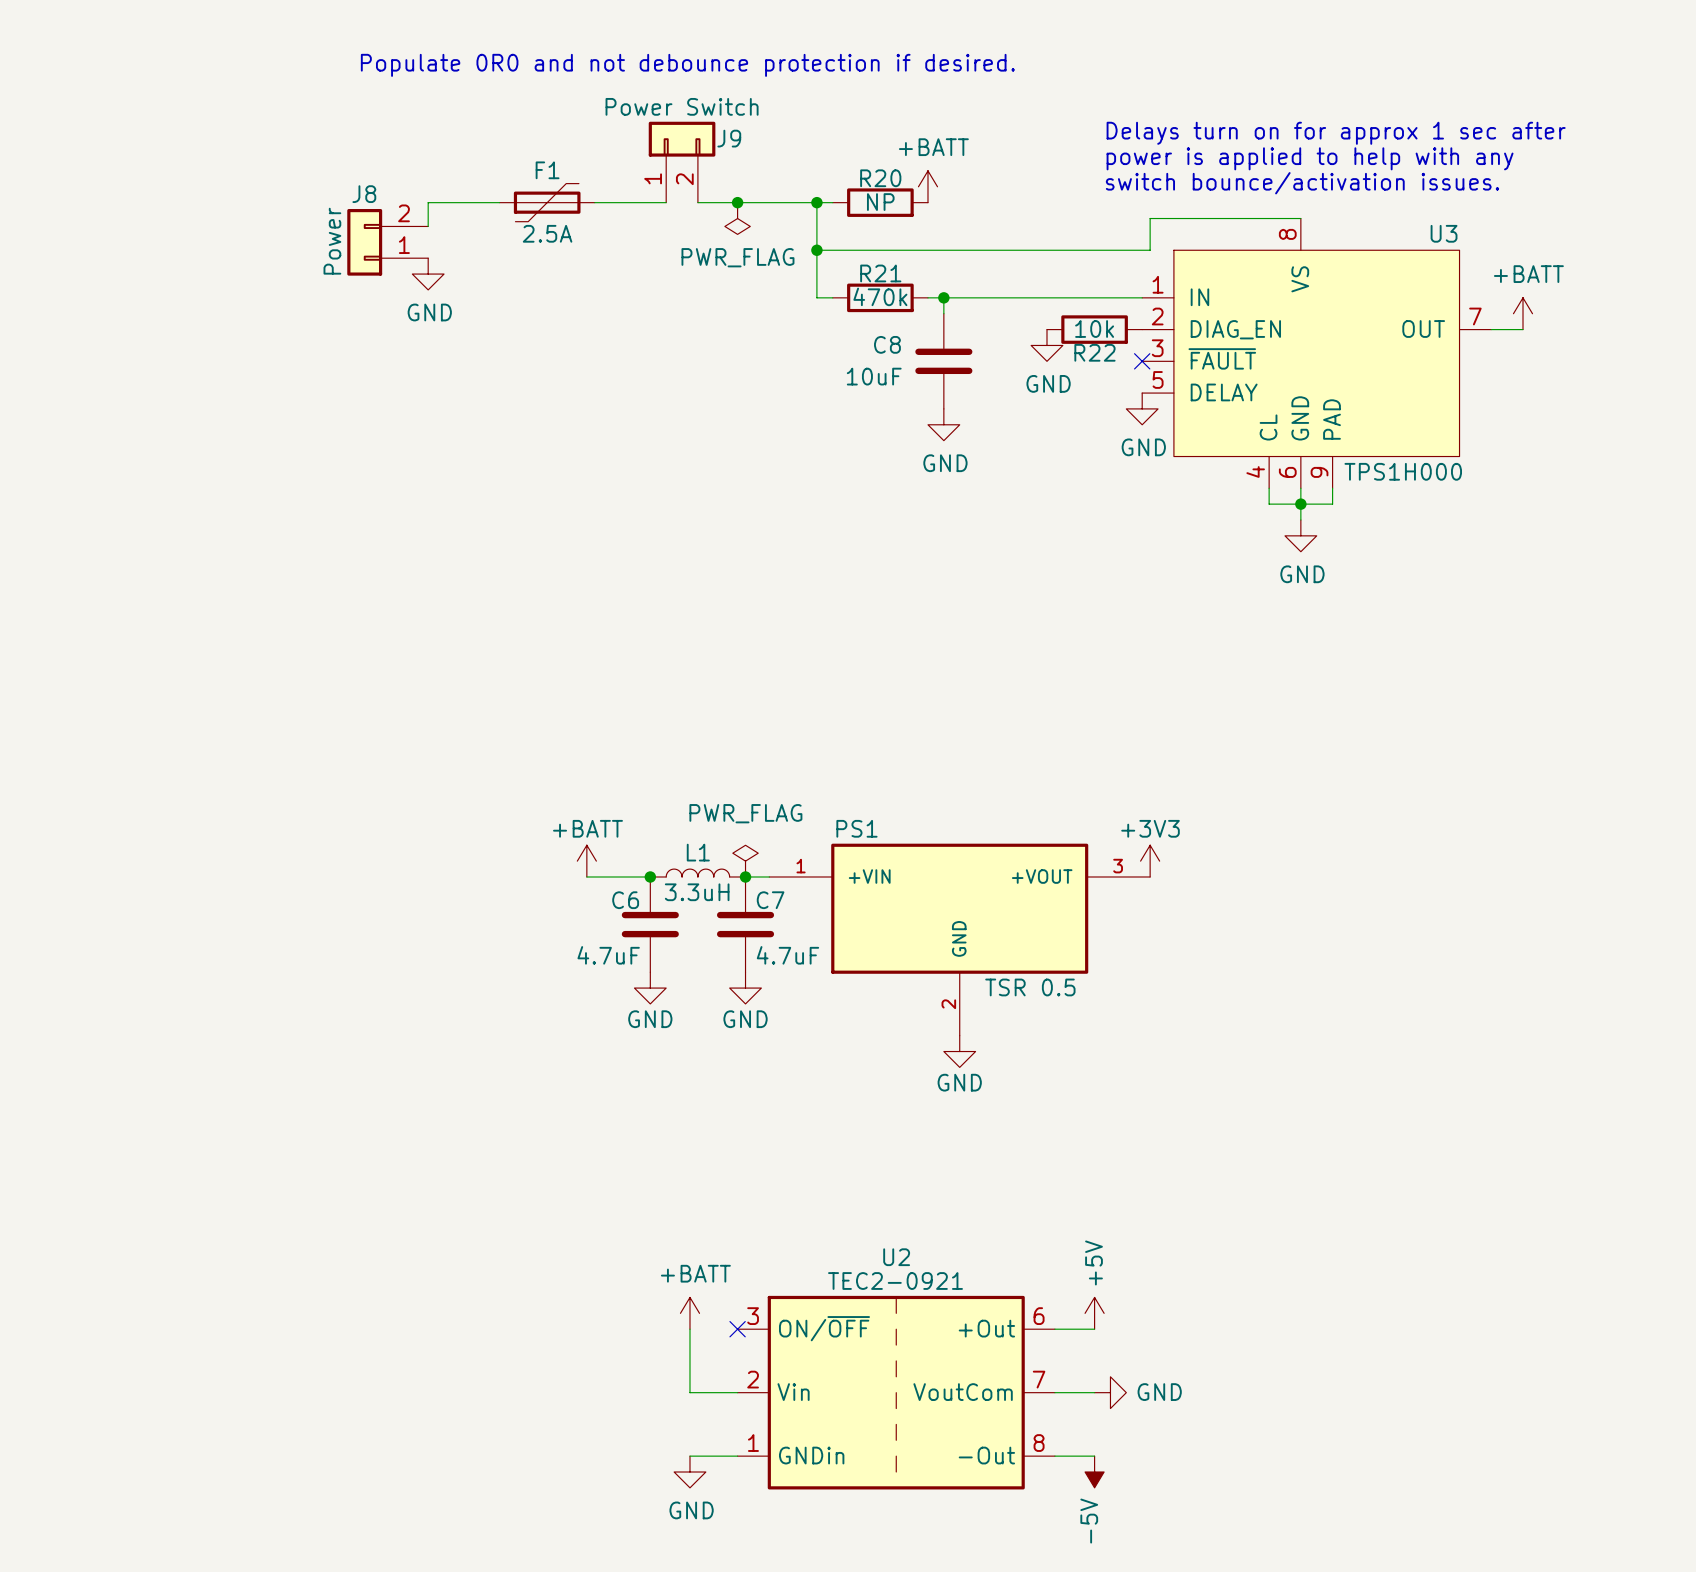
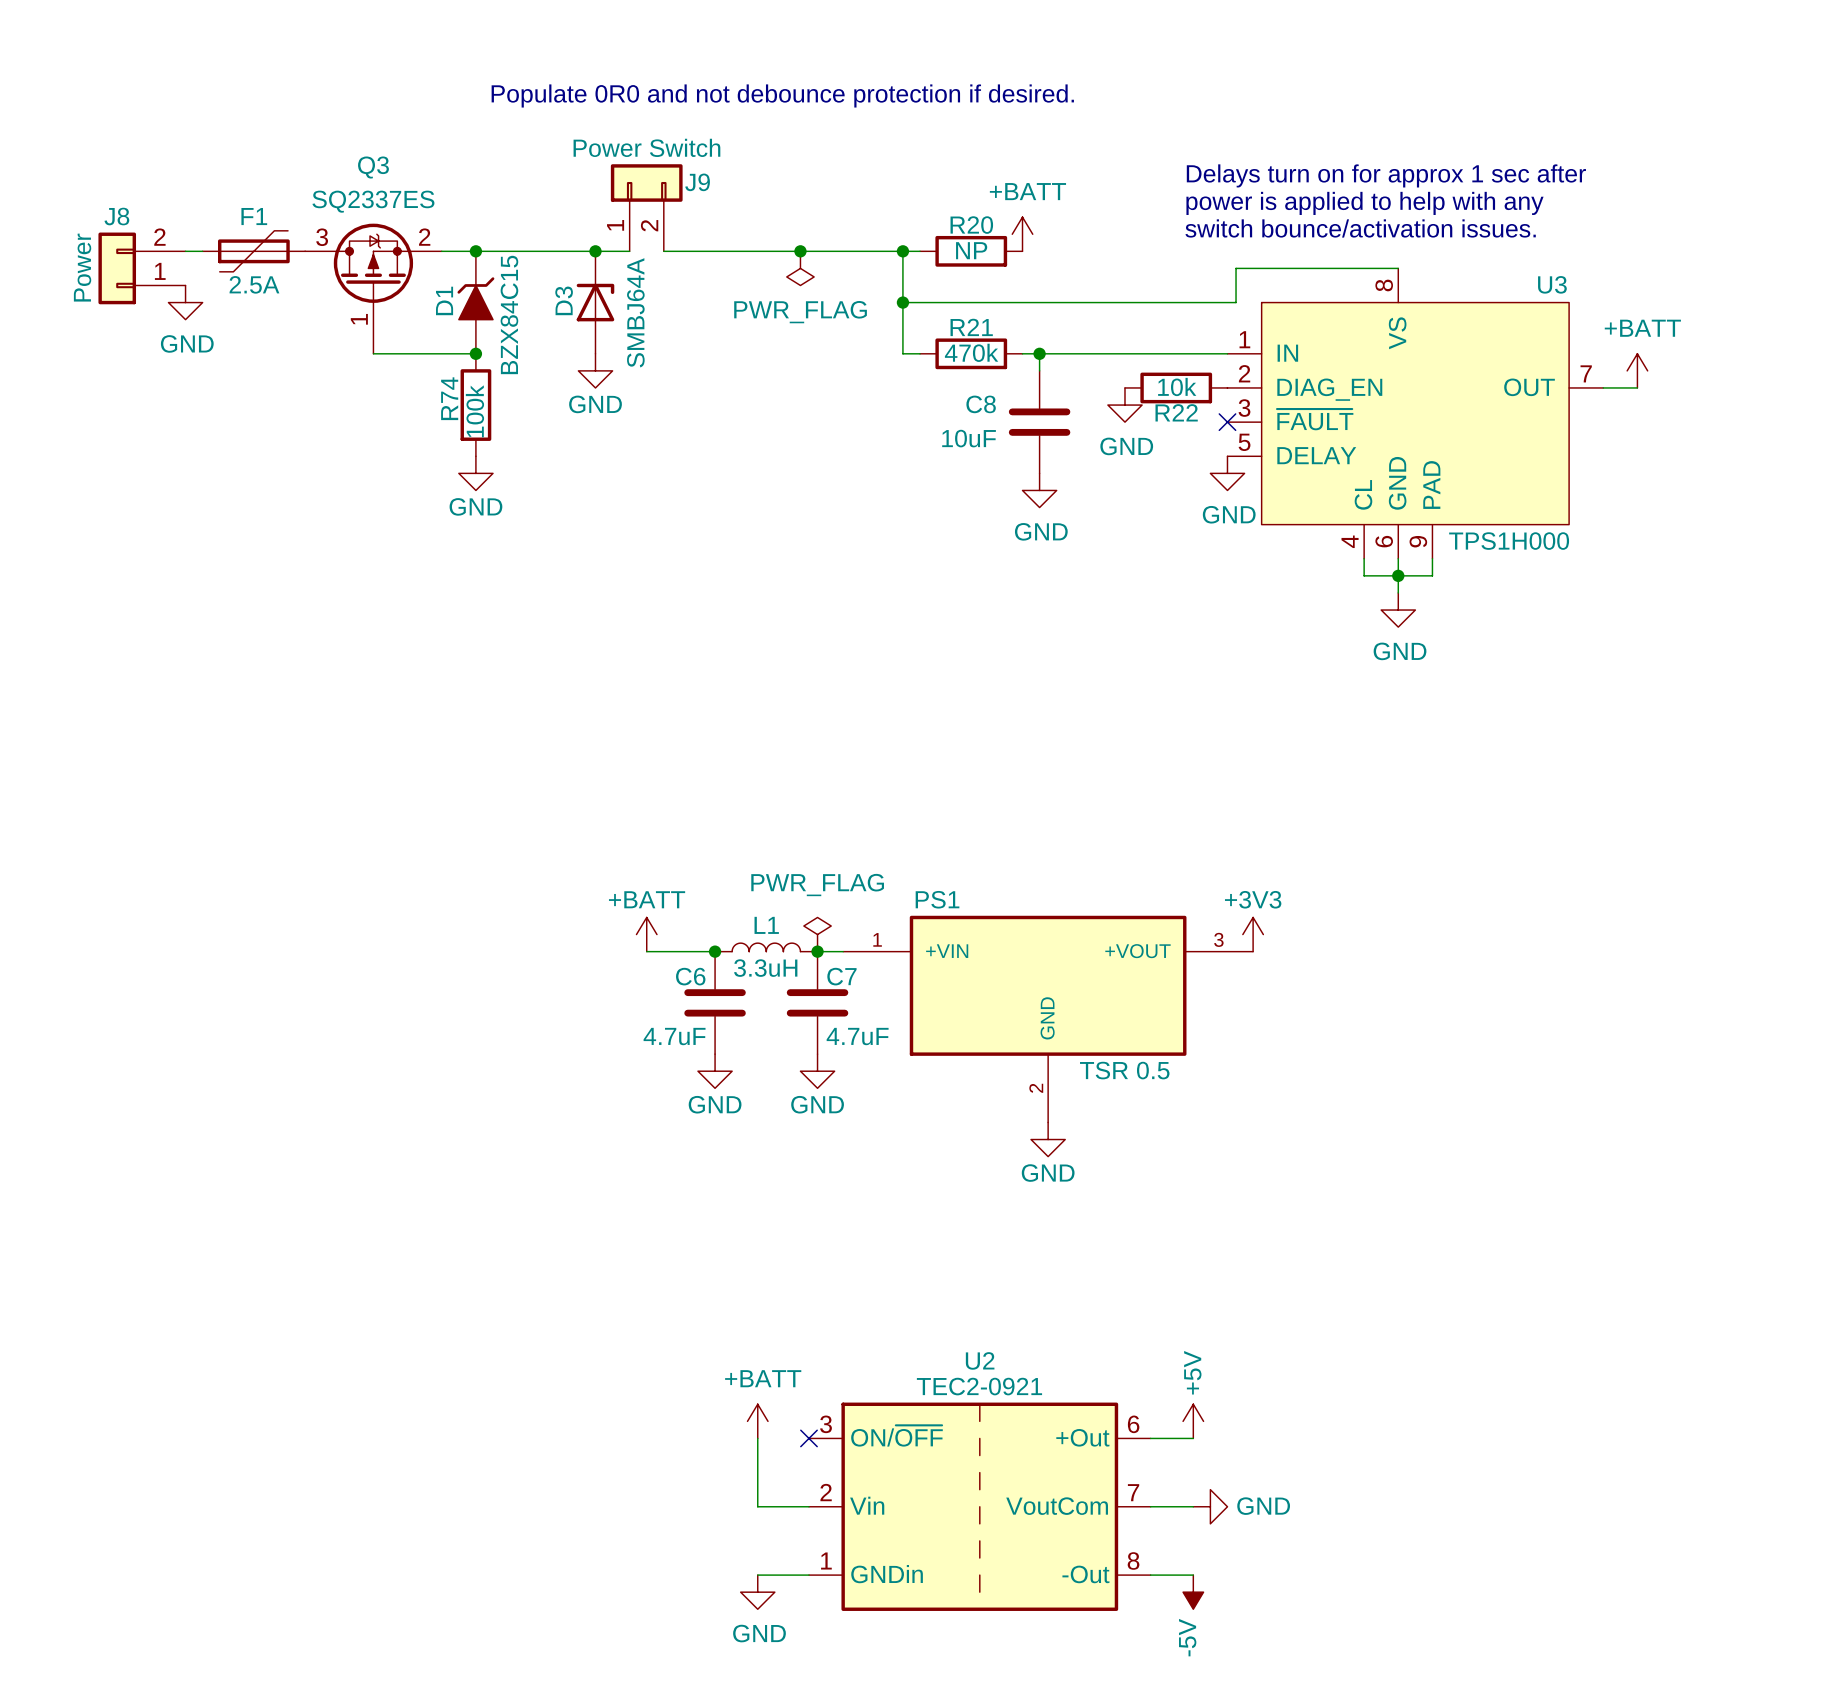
text position: Populate 0R0 and not debounce protection if desired. (687, 65) -> Populate 0R0 and not debounce protection if desired. (782, 95)
text position: Delays turn on for approx 1 sec after (1336, 133) -> Delays turn on for approx 1 sec after (1386, 175)
text position: power is applied to help with any (1310, 158) -> power is applied to help with any (1364, 203)
J9 position: (682, 162) -> (646, 207)
text position: switch bounce/activation issues. (1302, 183) -> switch bounce/activation issues. (1360, 228)
power symbol position: +BATT (927, 186) -> +BATT (1022, 234)
wire: (499, 202) (428, 202) (428, 226) -> none
F1 position: (547, 202) -> (253, 251)
wire: (594, 202) (666, 202) -> none
wire: (697, 202) (832, 202) -> none
junction position: (737, 202) -> (800, 251)
wire: (816, 202) (816, 297) (832, 297) -> (902, 251) (902, 353) (920, 353)
junction: (816, 202) -> none
R20 position: (880, 202) -> (971, 251)
power symbol position: PWR_FLAG (737, 218) -> PWR_FLAG (800, 268)
wire: (1300, 218) (1150, 218) (1150, 250) (816, 250) -> none
wire: none -> (185, 251) (202, 251)
wire: none -> (441, 251) (629, 251)
junction: none -> (475, 251)
junction: none -> (595, 251)
wire: none -> (663, 251) (920, 251)
junction: none -> (902, 251)
J8 position: (387, 242) -> (141, 268)
wire: none -> (1398, 268) (1236, 268) (1236, 302) (902, 302)
junction: (816, 250) -> none
Q3: none -> (373, 288)
power symbol: none -> GND (185, 302)
D1: none -> (475, 302)
power symbol: GND (428, 274) -> none
D3: none -> (595, 302)
junction: none -> (902, 302)
R21 position: (880, 297) -> (971, 353)
wire: (927, 297) (1142, 297) -> none
wire: (943, 297) (943, 313) -> (1039, 353) (1039, 370)
junction position: (943, 297) -> (1039, 353)
power symbol position: +BATT (1523, 313) -> +BATT (1637, 370)
wire: none -> (373, 353) (475, 353)
junction: none -> (475, 353)
wire: none -> (1022, 353) (1227, 353)
R22 position: (1094, 329) -> (1176, 387)
wire: (1491, 329) (1523, 329) -> (1603, 387) (1637, 387)
power symbol: none -> GND (595, 370)
power symbol position: GND (1046, 345) -> GND (1124, 405)
U3 position: (1316, 353) -> (1415, 413)
C8 position: (943, 361) -> (1039, 422)
no-connect mark position: (1142, 361) -> (1227, 422)
R74: none -> (475, 405)
power symbol position: GND (1142, 408) -> GND (1227, 473)
power symbol position: GND (943, 424) -> GND (1039, 490)
power symbol: none -> GND (475, 473)
wire: (1269, 488) (1269, 504) (1332, 504) (1332, 488) -> (1364, 558) (1364, 575) (1432, 575) (1432, 558)
wire: (1300, 488) (1300, 519) -> (1398, 558) (1398, 592)
junction position: (1300, 504) -> (1398, 575)
power symbol position: GND (1300, 535) -> GND (1398, 610)

